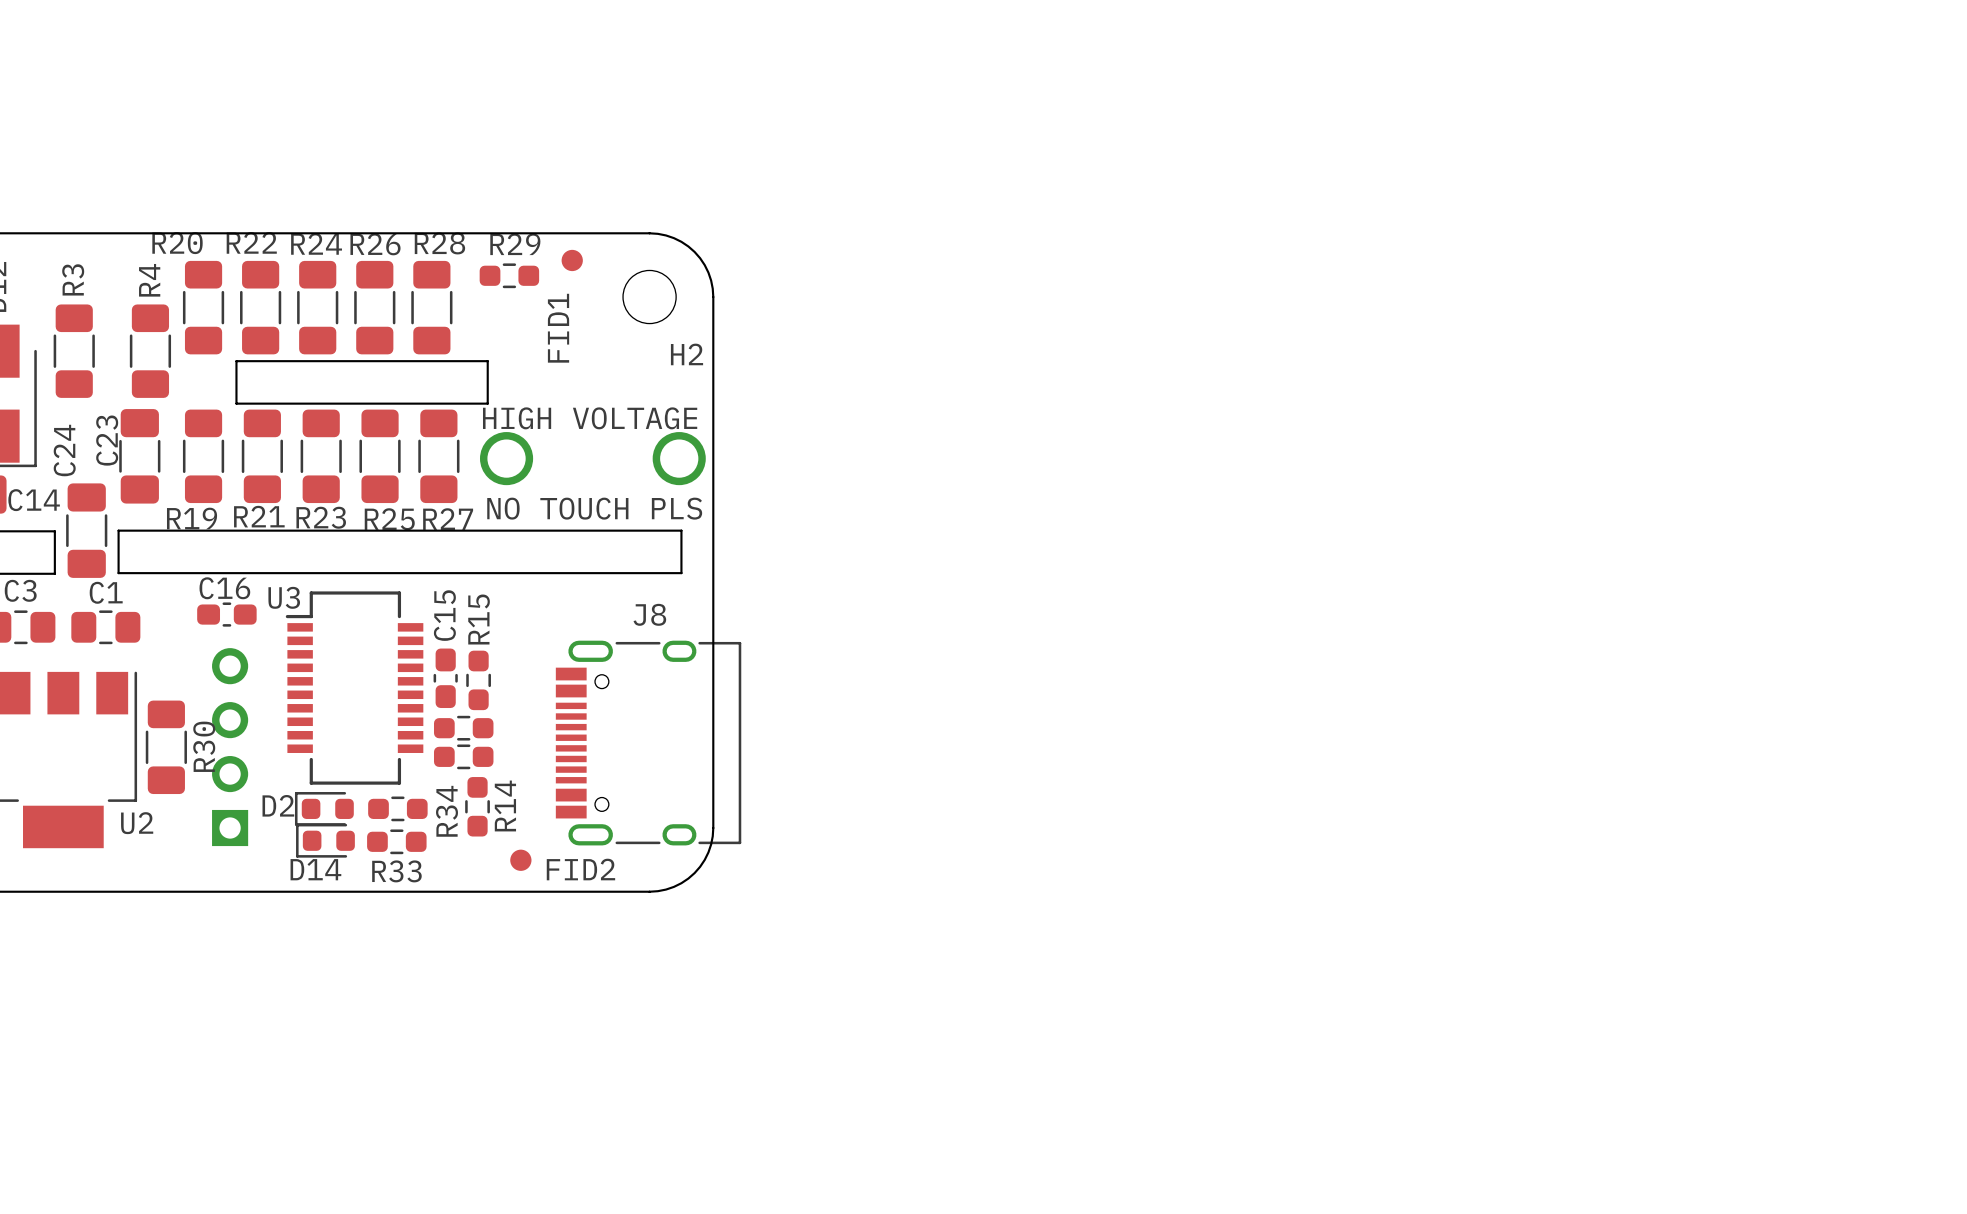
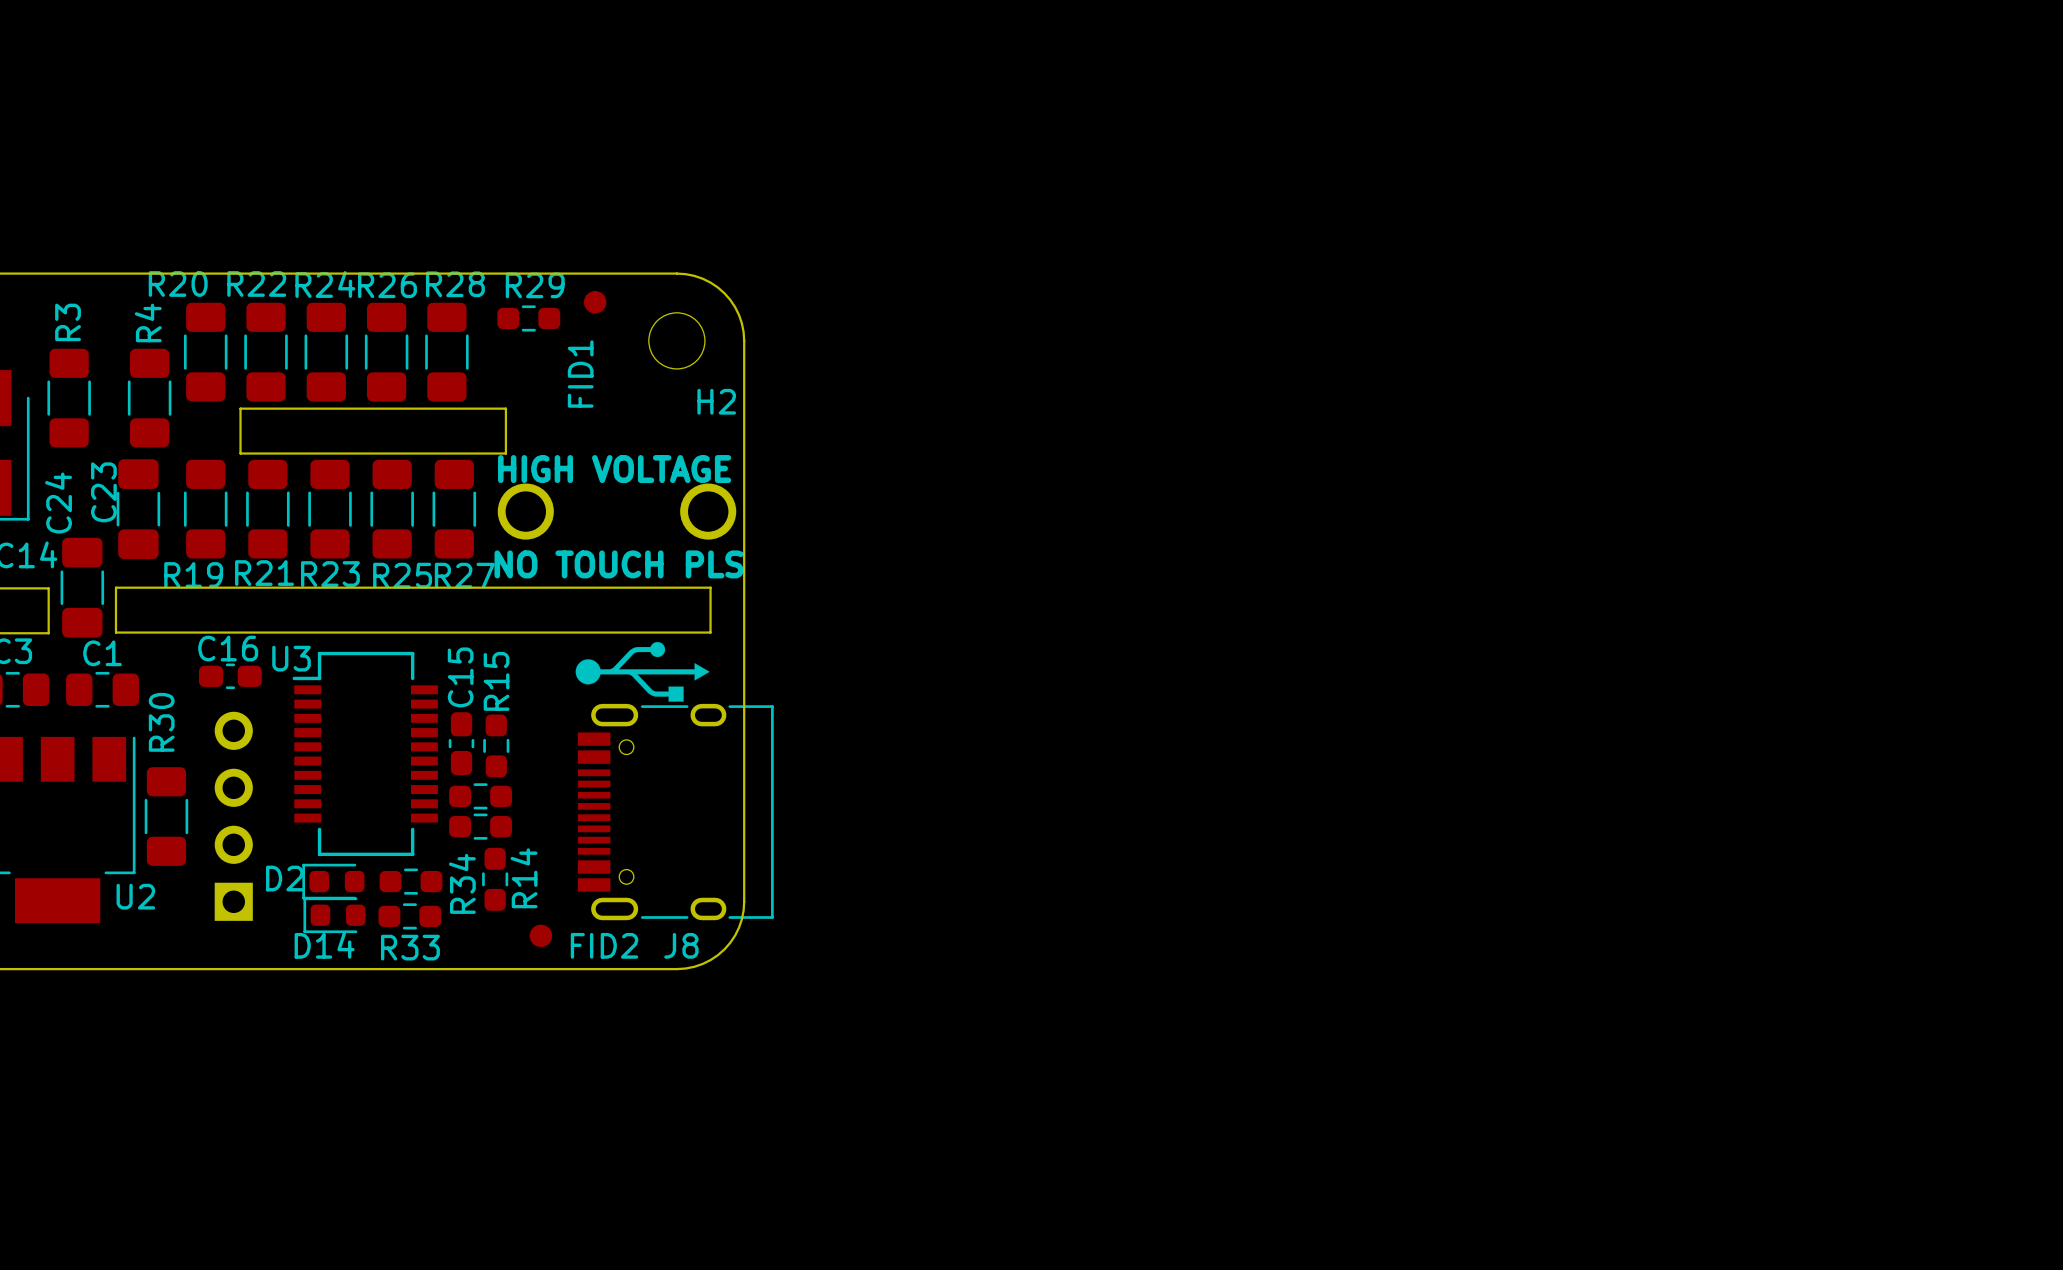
drawing: none -> [575, 642, 710, 702]
J8 name position: J8 (649, 614) -> J8 (681, 945)
R30 name position: R30 (204, 746) -> R30 (161, 722)

